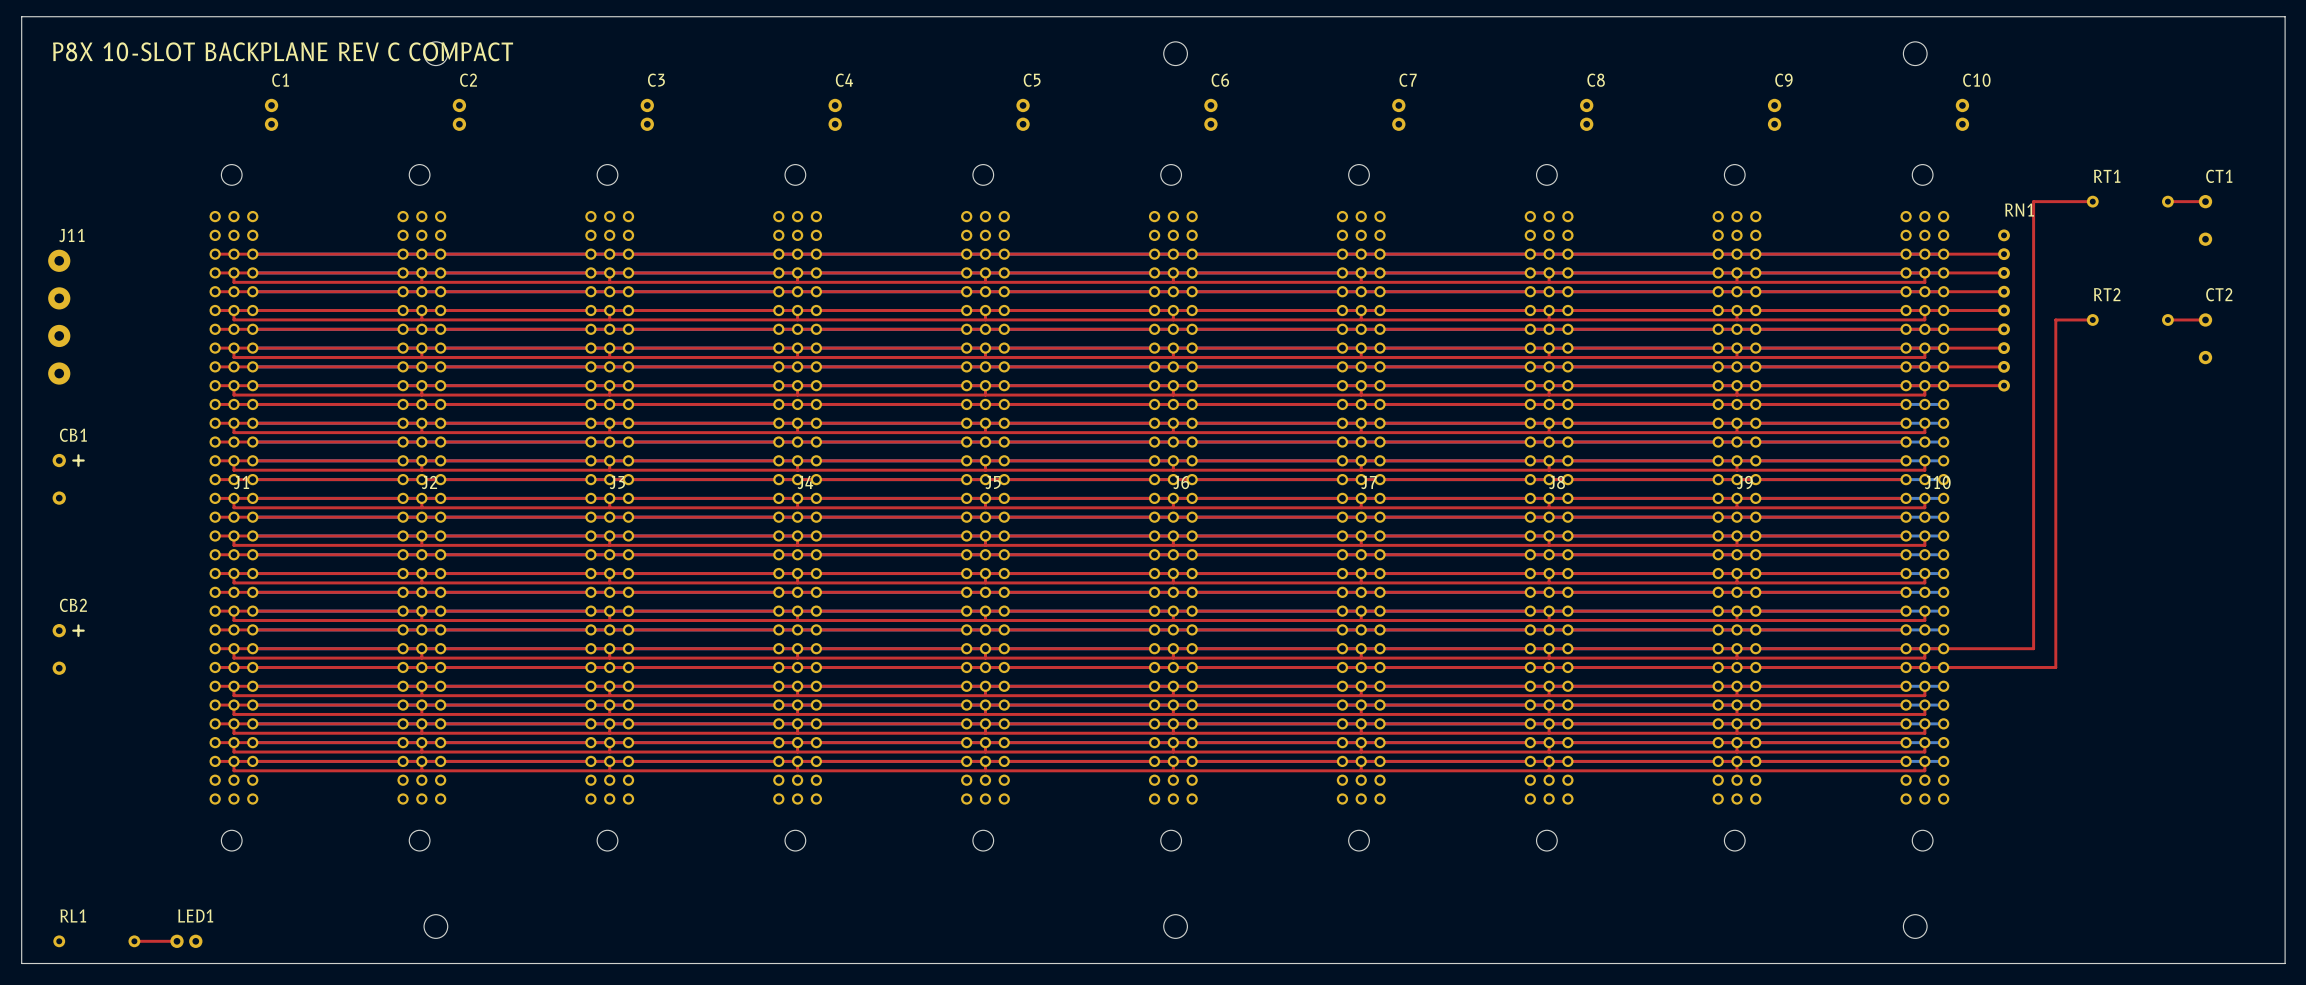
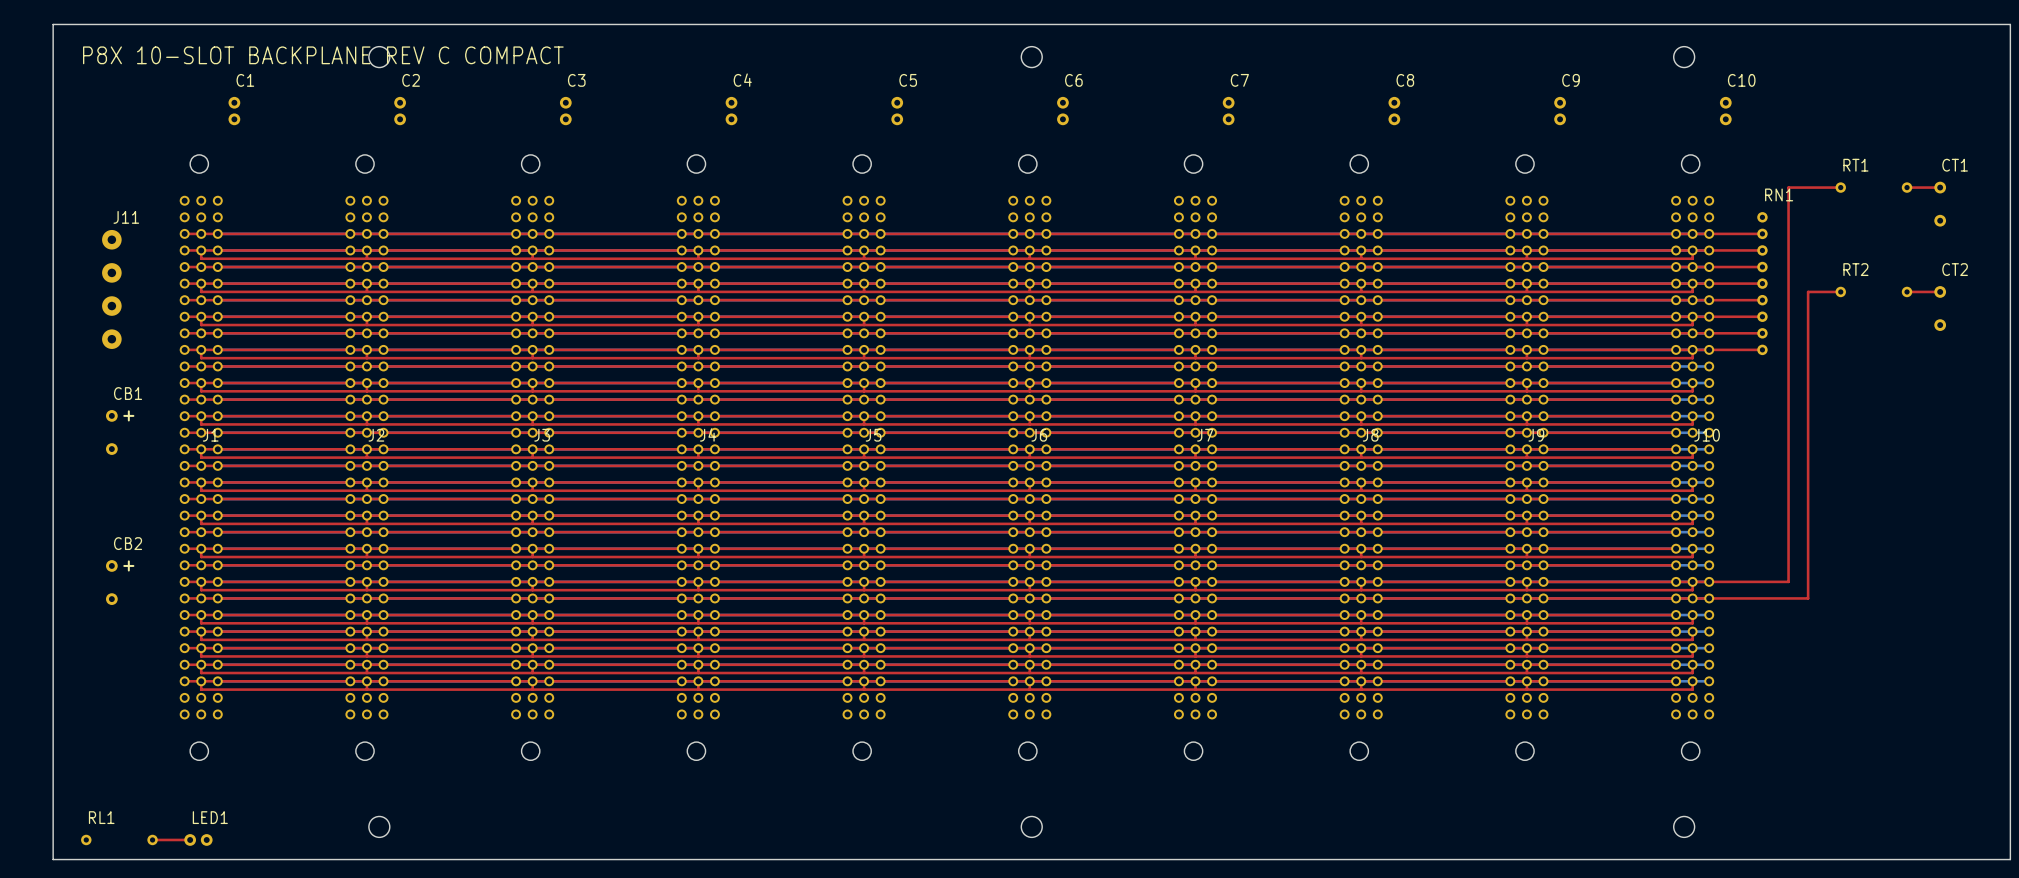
board edge: (66, 16) (21, 16) (21, 963) (66, 963) -> (53, 24) (53, 859)
text position: P8X 10-SLOT BACKPLANE REV C COMPACT (283, 51) -> P8X 10-SLOT BACKPLANE REV C COMPACT (323, 55)
J11 position: (59, 317) -> (111, 289)
CB1 position: (68, 479) -> (120, 432)
CB2 position: (68, 649) -> (120, 582)
RL1 position: (96, 941) -> (119, 839)
top track: (134, 941) (177, 941) -> (152, 839) (190, 839)
LED1 position: (186, 941) -> (198, 839)

